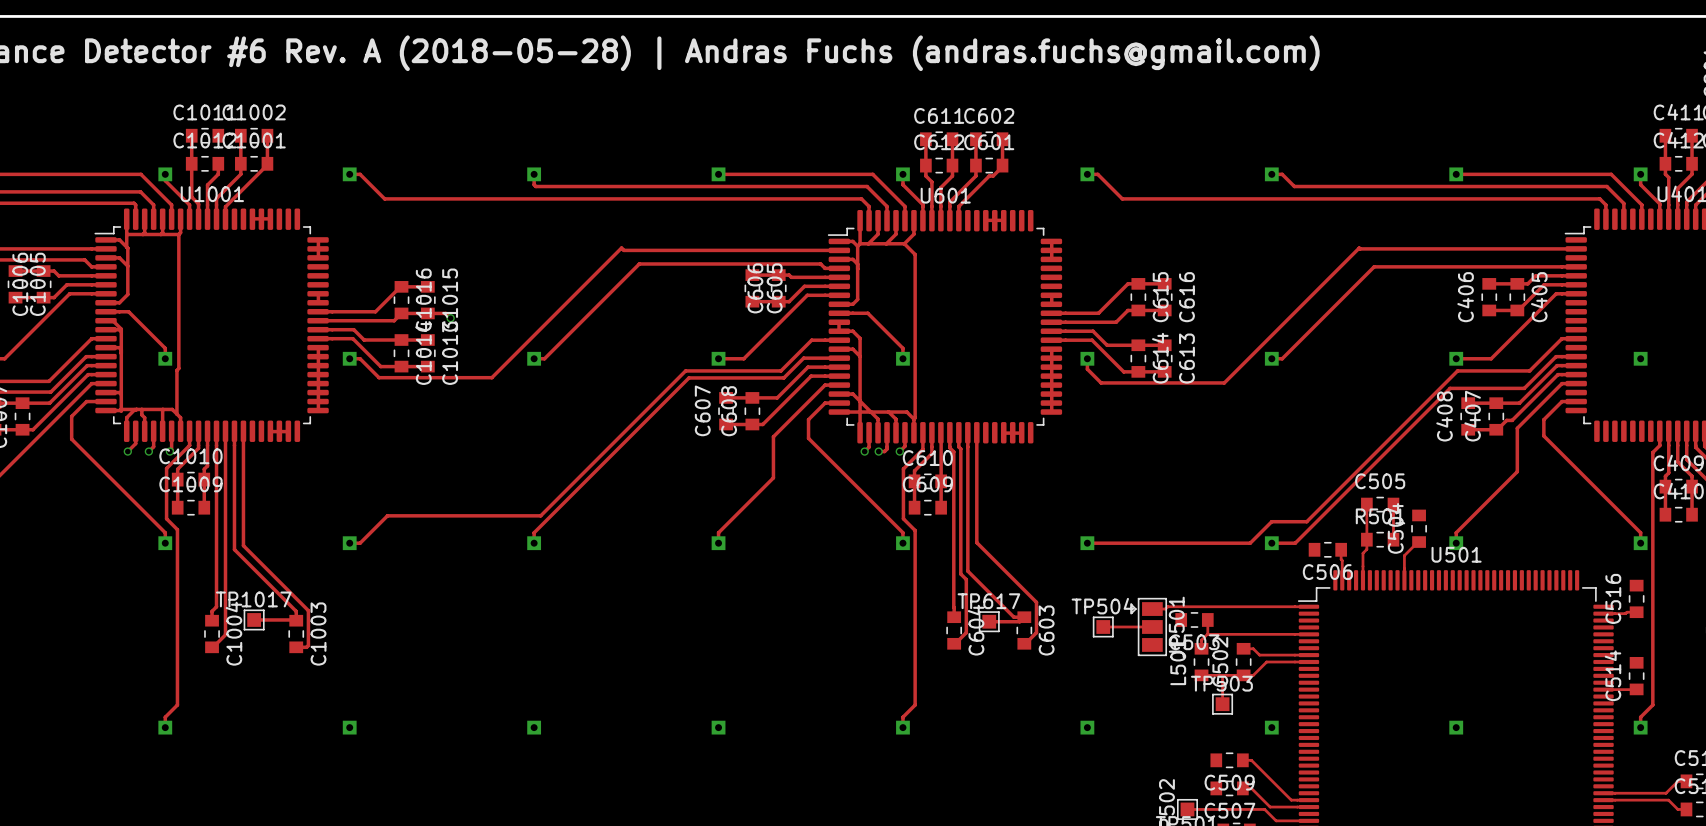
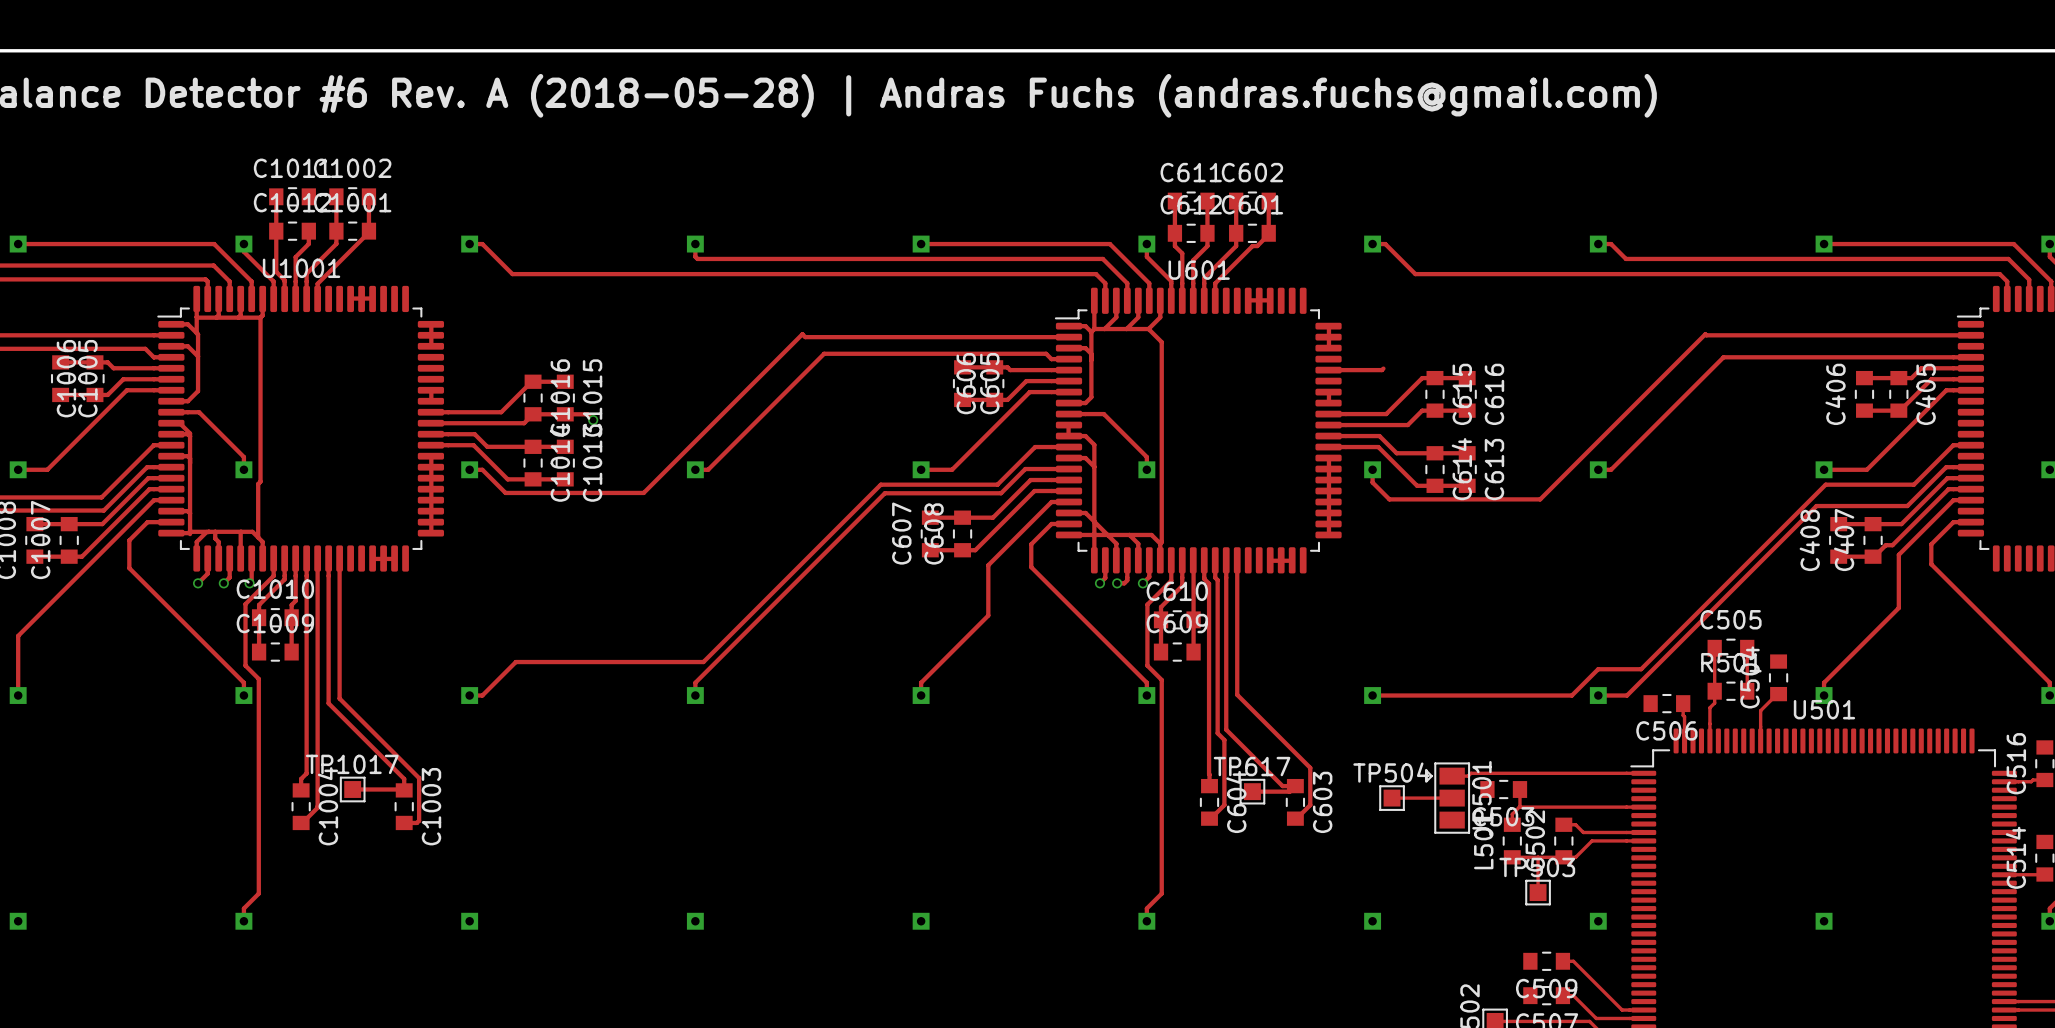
track: none -> (1383, 368) (1328, 370)

